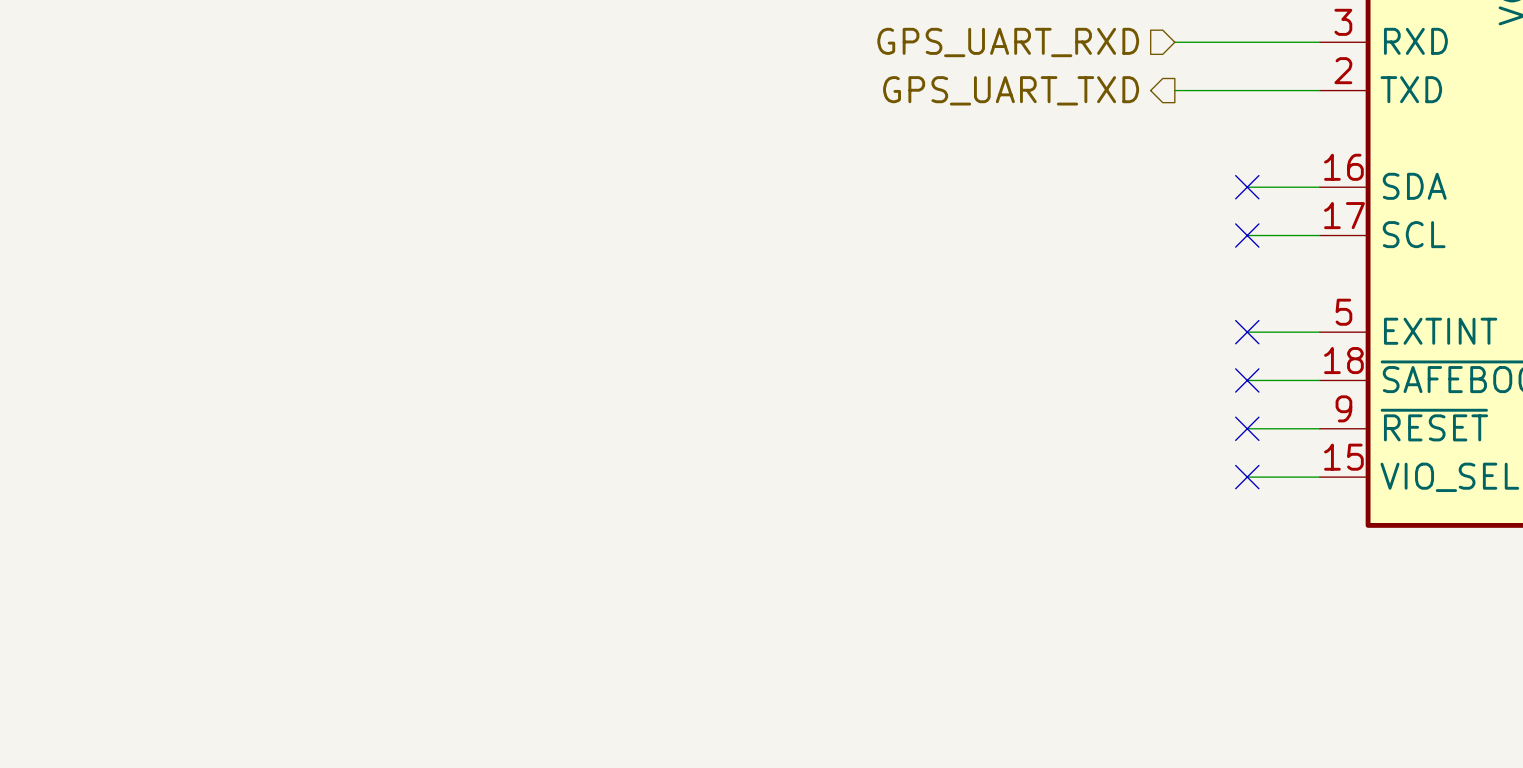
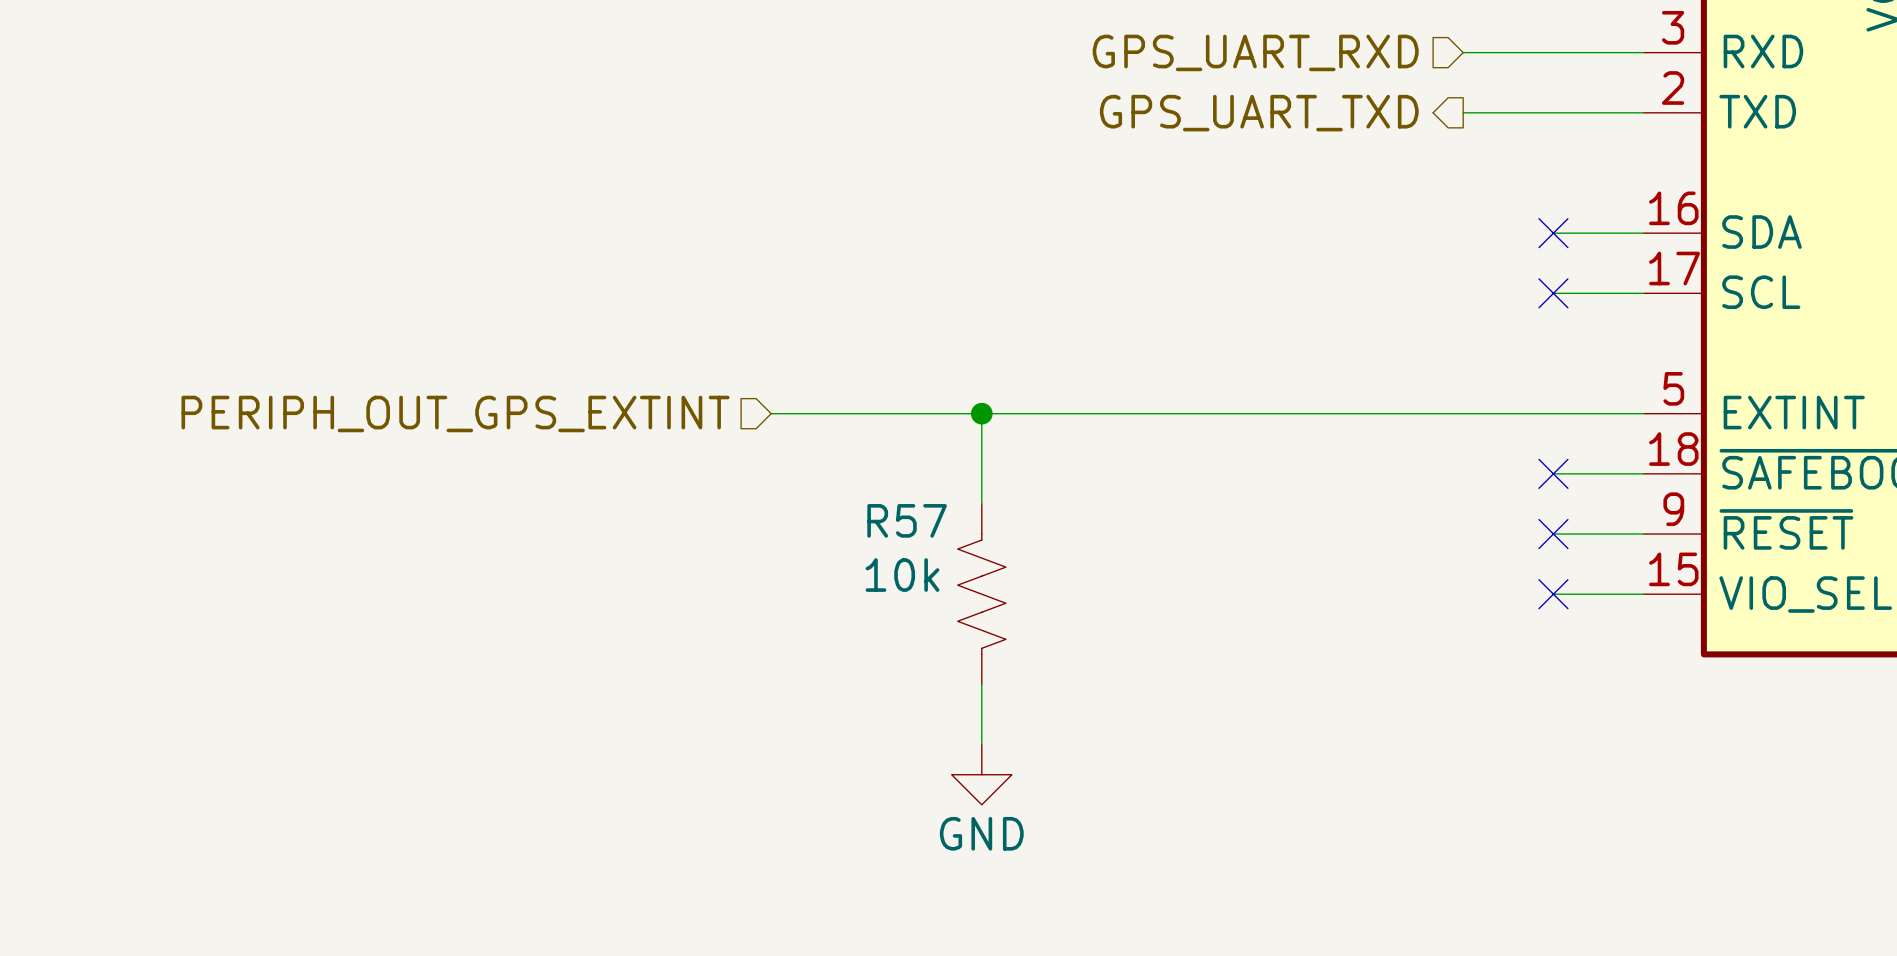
hierarchical label: none -> PERIPH_OUT_GPS_EXTINT (455, 413)
wire: none -> (771, 413) (1553, 413)
wire: none -> (981, 413) (981, 503)
junction: none -> (981, 413)
no-connect mark: (1247, 332) -> none
R57: none -> 10k (981, 594)
wire: none -> (981, 684) (981, 744)
power symbol: none -> GND (981, 774)

